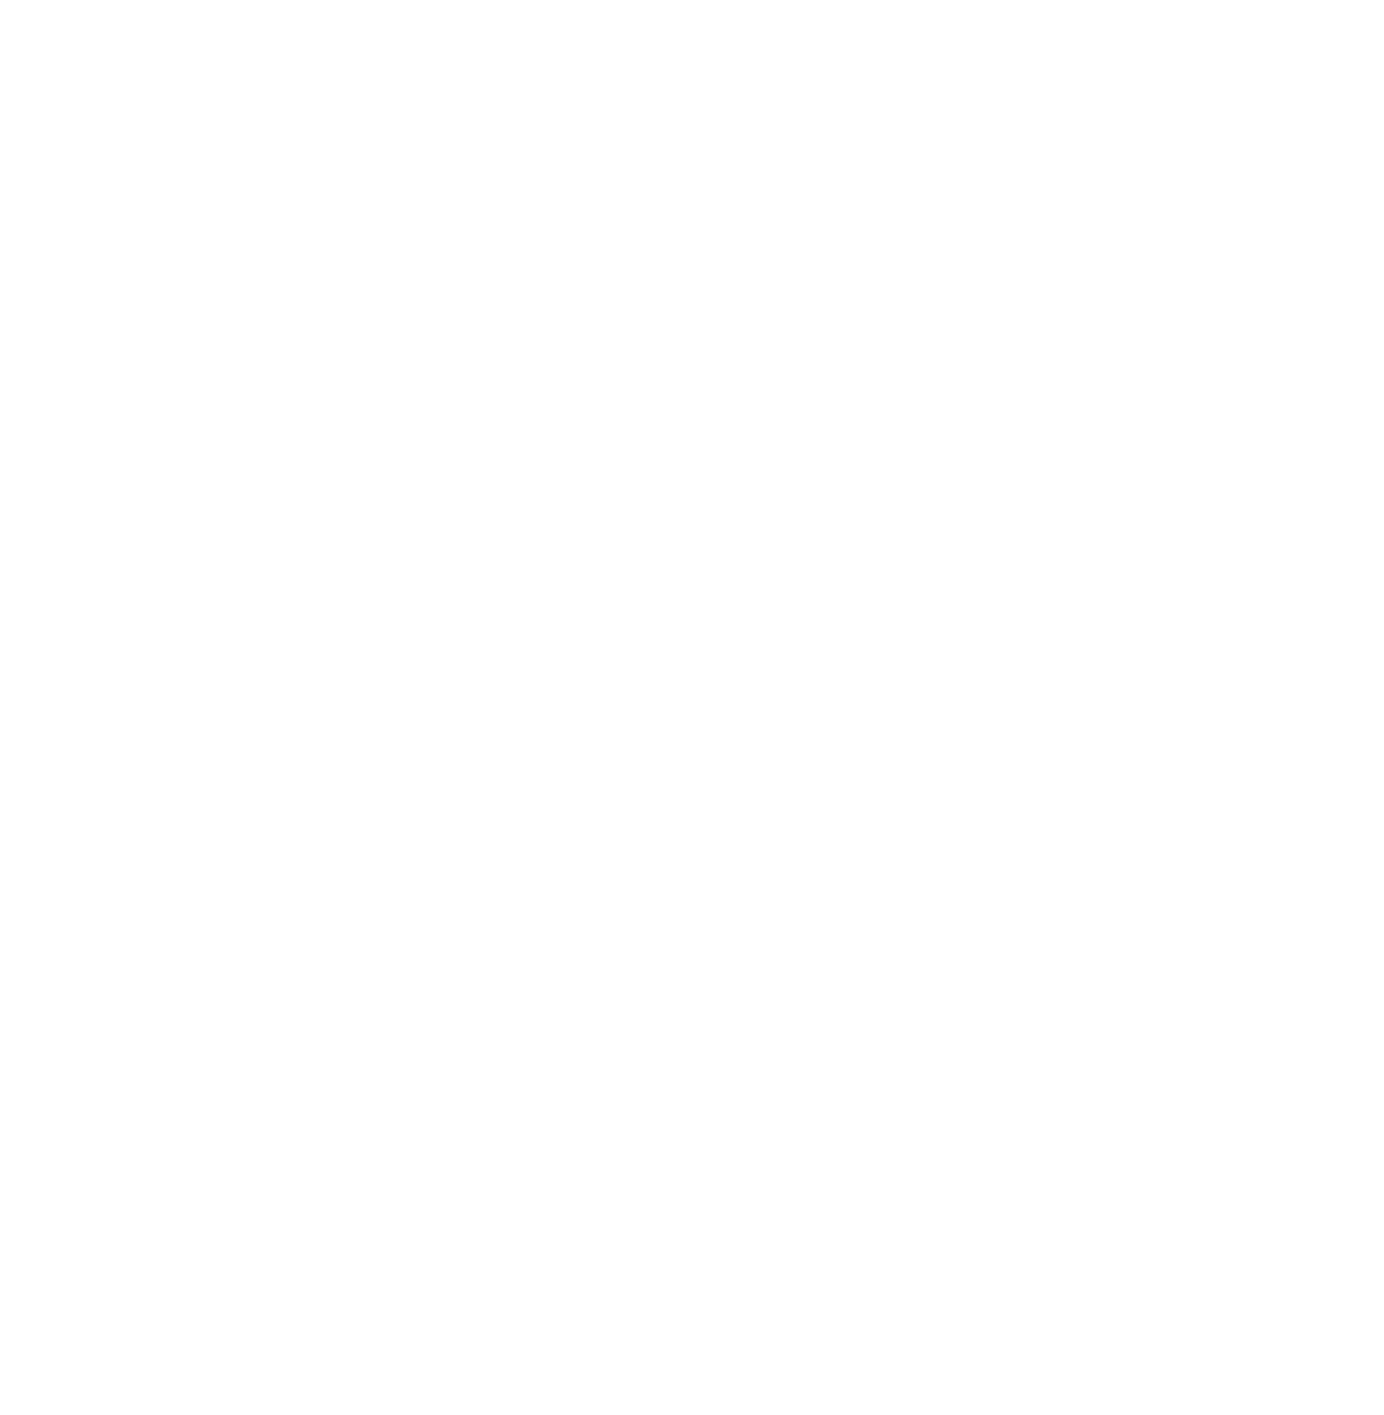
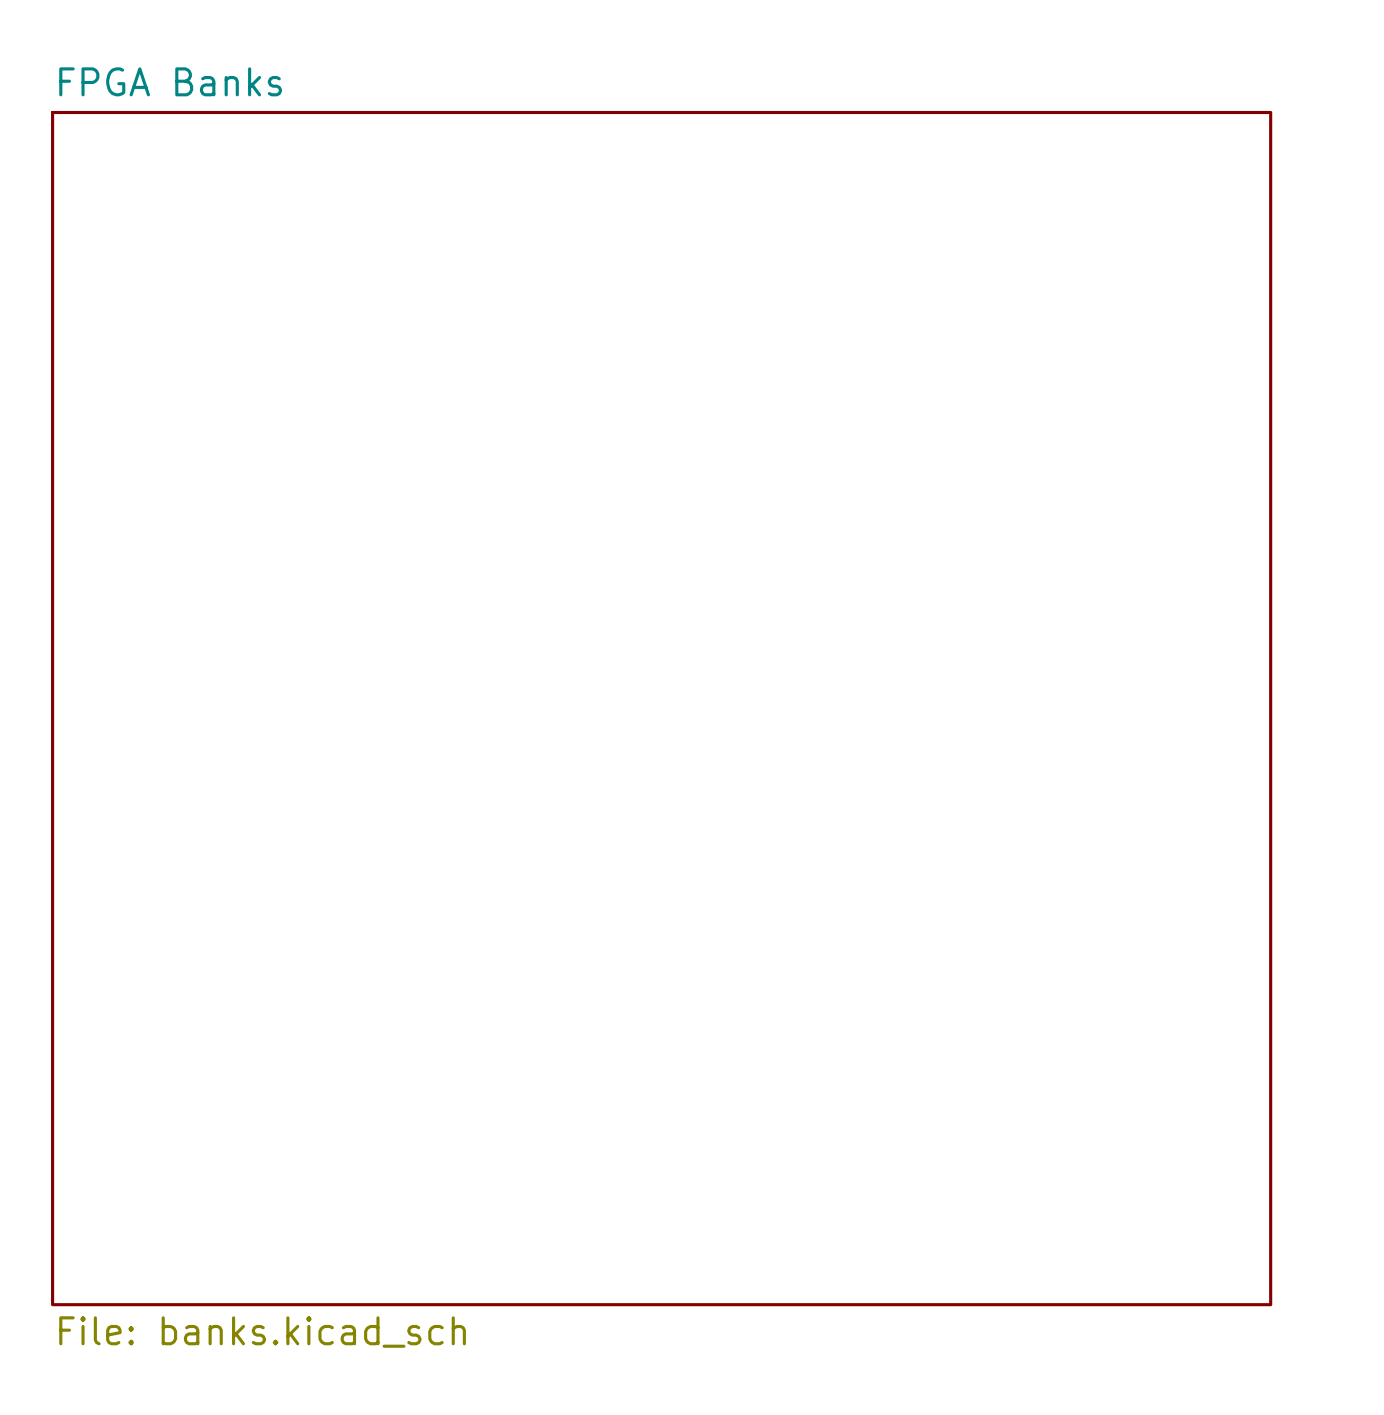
sheet FPGA Banks: none -> File: banks.kicad_sch (661, 708)

